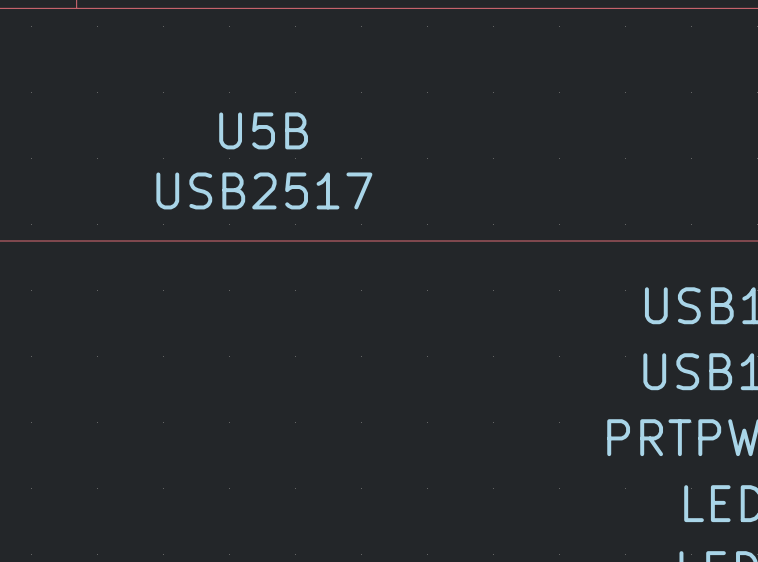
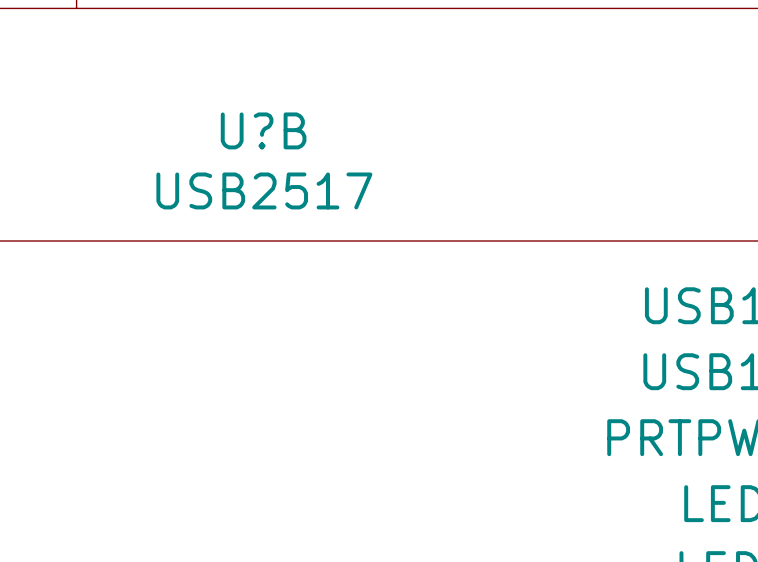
U5B name: U5B (263, 130) -> U?B (263, 130)

